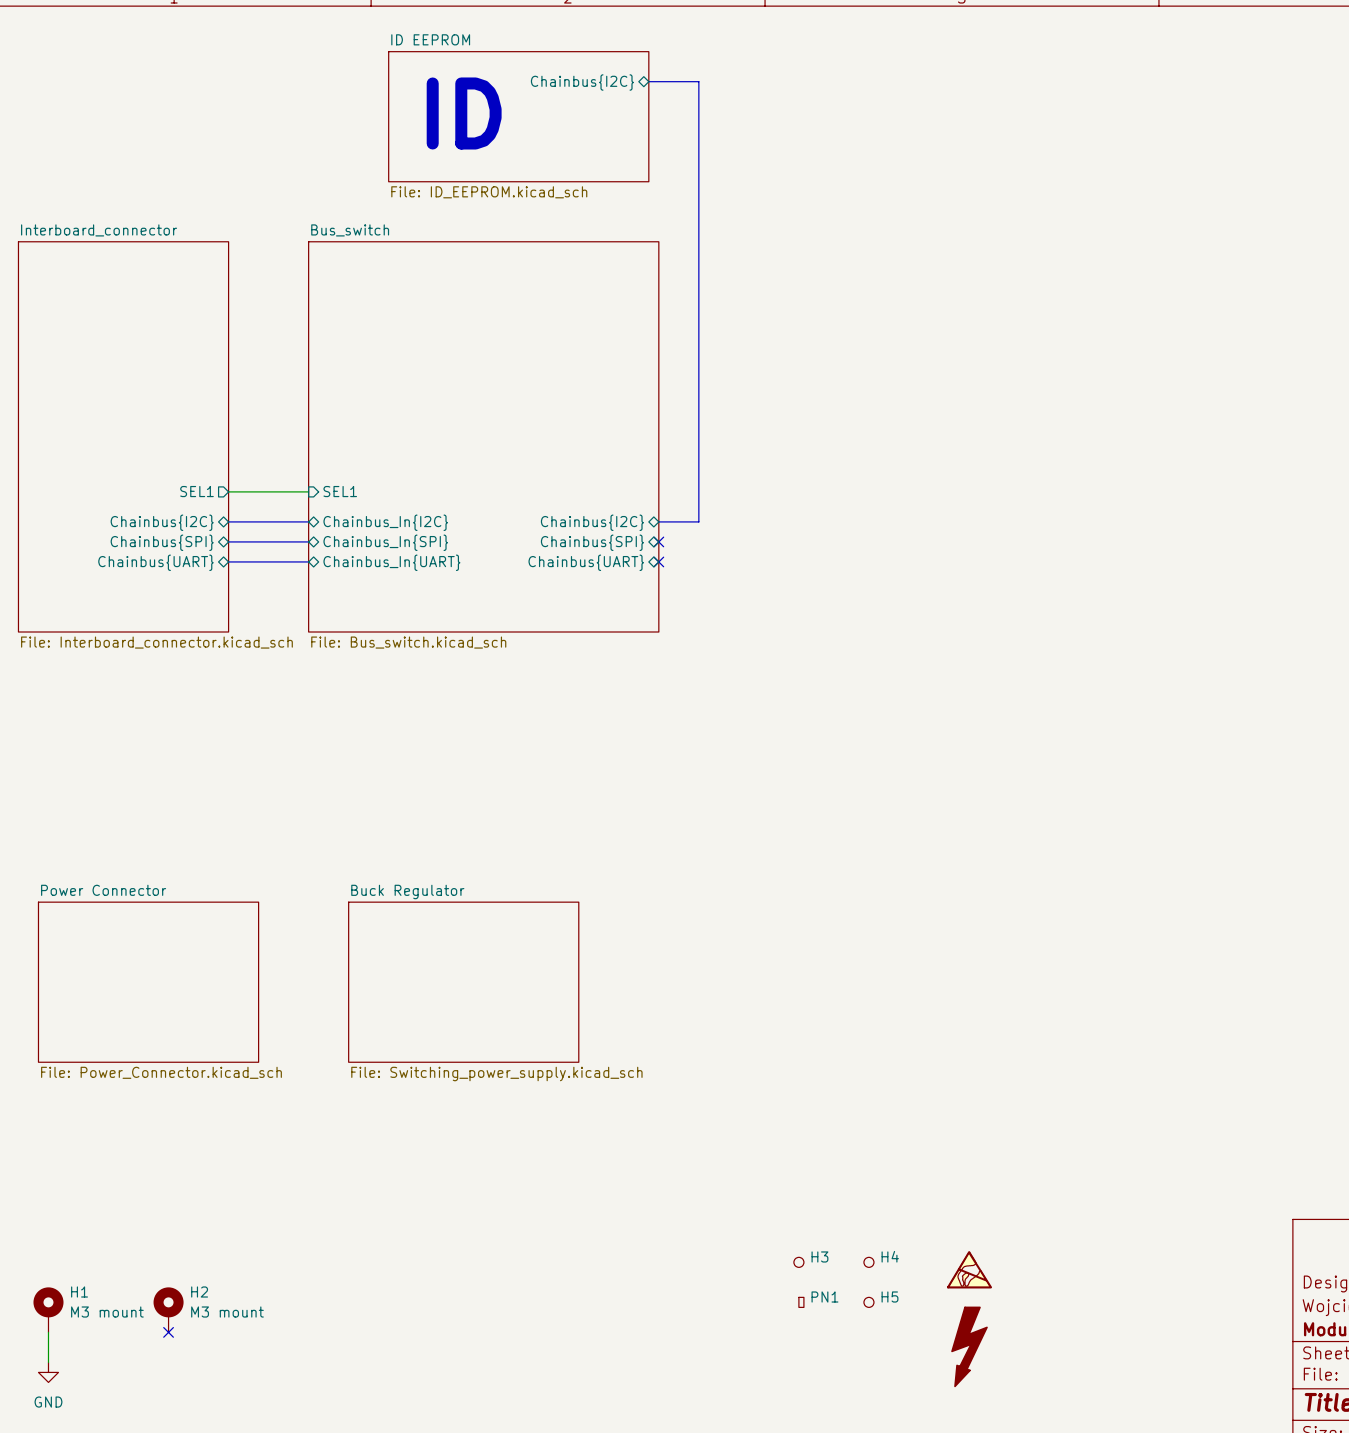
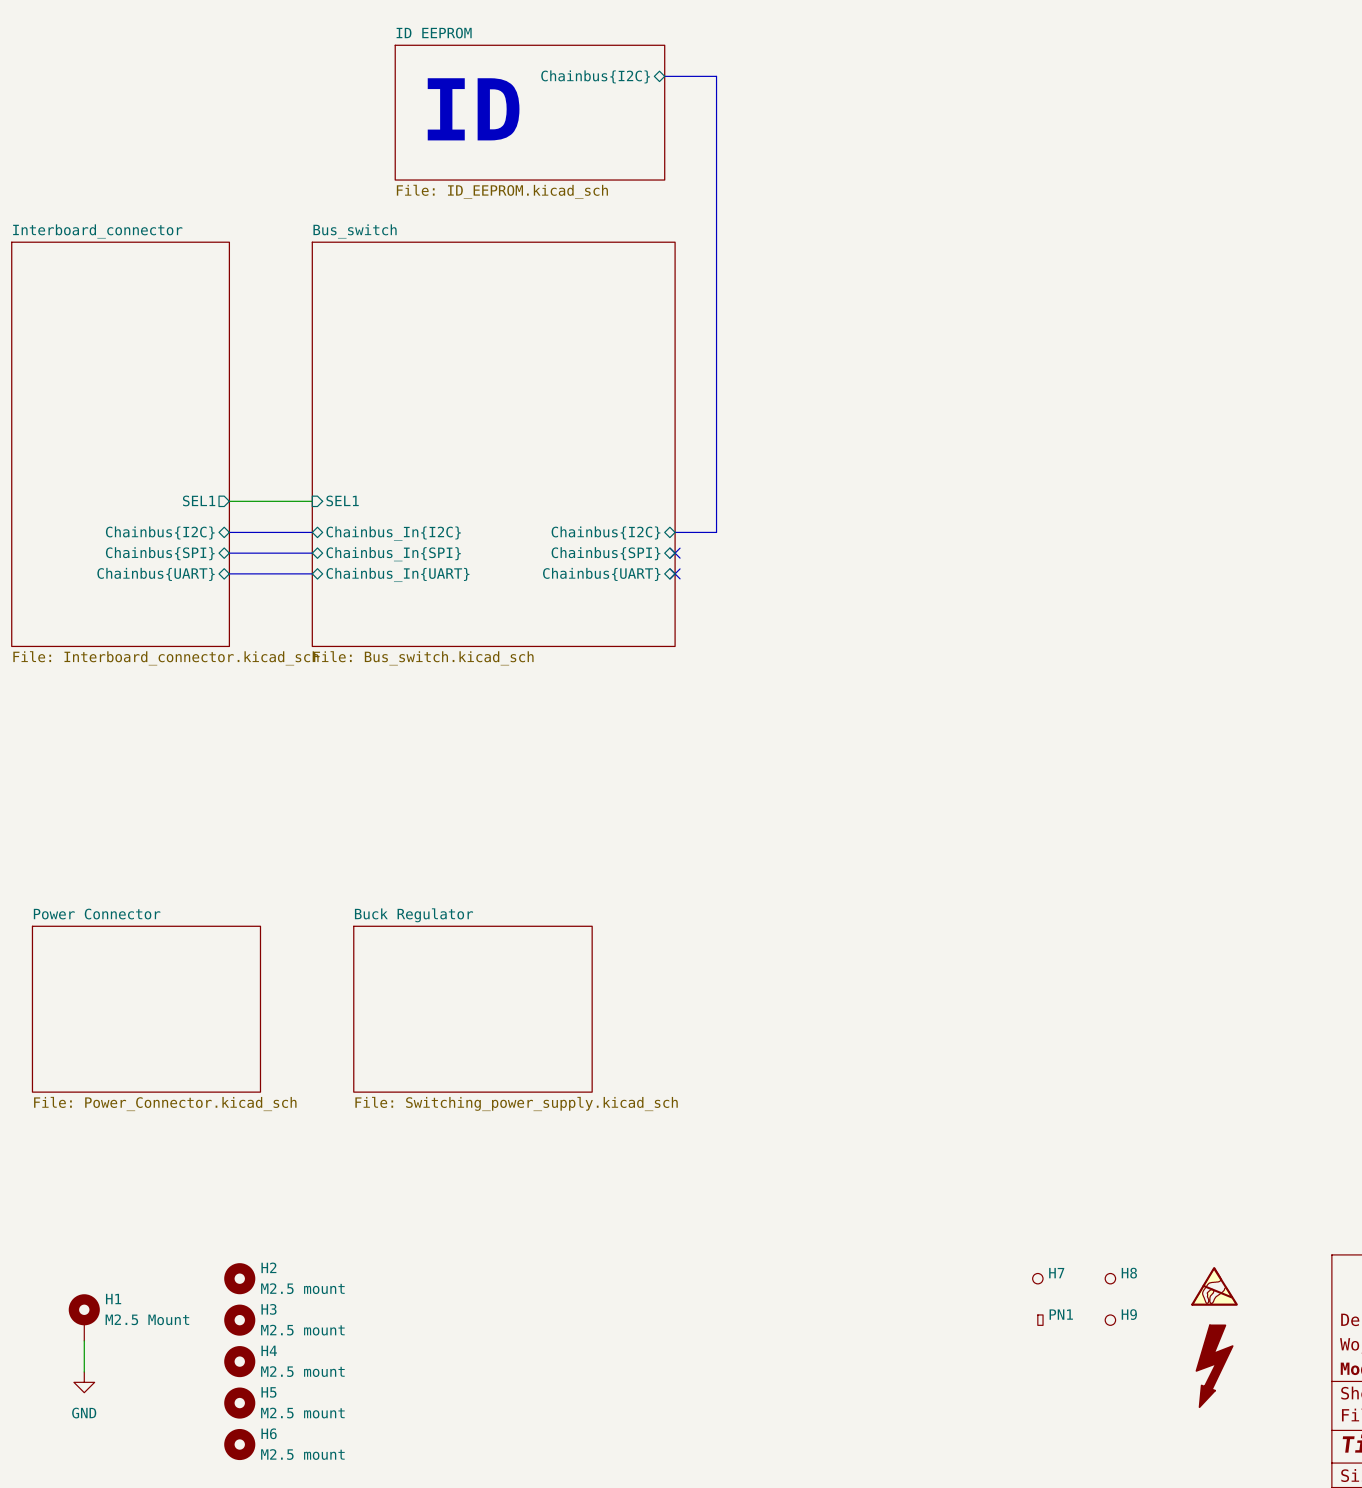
H7: none -> (1037, 1278)
H8: none -> (1110, 1278)
power symbol: none -> (1214, 1286)
H3 symbol: [793, 1257, 804, 1268] -> [224, 1304, 256, 1336]
H4 symbol: [863, 1257, 874, 1268] -> [224, 1346, 256, 1378]
power symbol: (969, 1269) -> none
H9: none -> (1110, 1320)
H2 symbol: [153, 1287, 184, 1333] -> [224, 1263, 256, 1295]
H3 value: none -> M2.5 mount (302, 1330)
H5 symbol: [863, 1297, 874, 1308] -> [224, 1387, 256, 1419]
PN1 position: (801, 1302) -> (1040, 1320)
H1 position: (48, 1309) -> (84, 1317)
H1 value: M3 mount (107, 1312) -> M2.5 Mount (147, 1319)
H2 value: M3 mount (227, 1312) -> M2.5 mount (302, 1288)
power symbol: none -> (1214, 1366)
wire: (48, 1332) (48, 1362) -> (84, 1340) (84, 1371)
no-connect mark: (168, 1332) -> none
H4 value: none -> M2.5 mount (302, 1371)
power symbol: (969, 1346) -> none
power symbol position: GND (48, 1372) -> GND (84, 1382)
H5 value: none -> M2.5 mount (302, 1413)
H6: none -> M2.5 mount (239, 1444)

